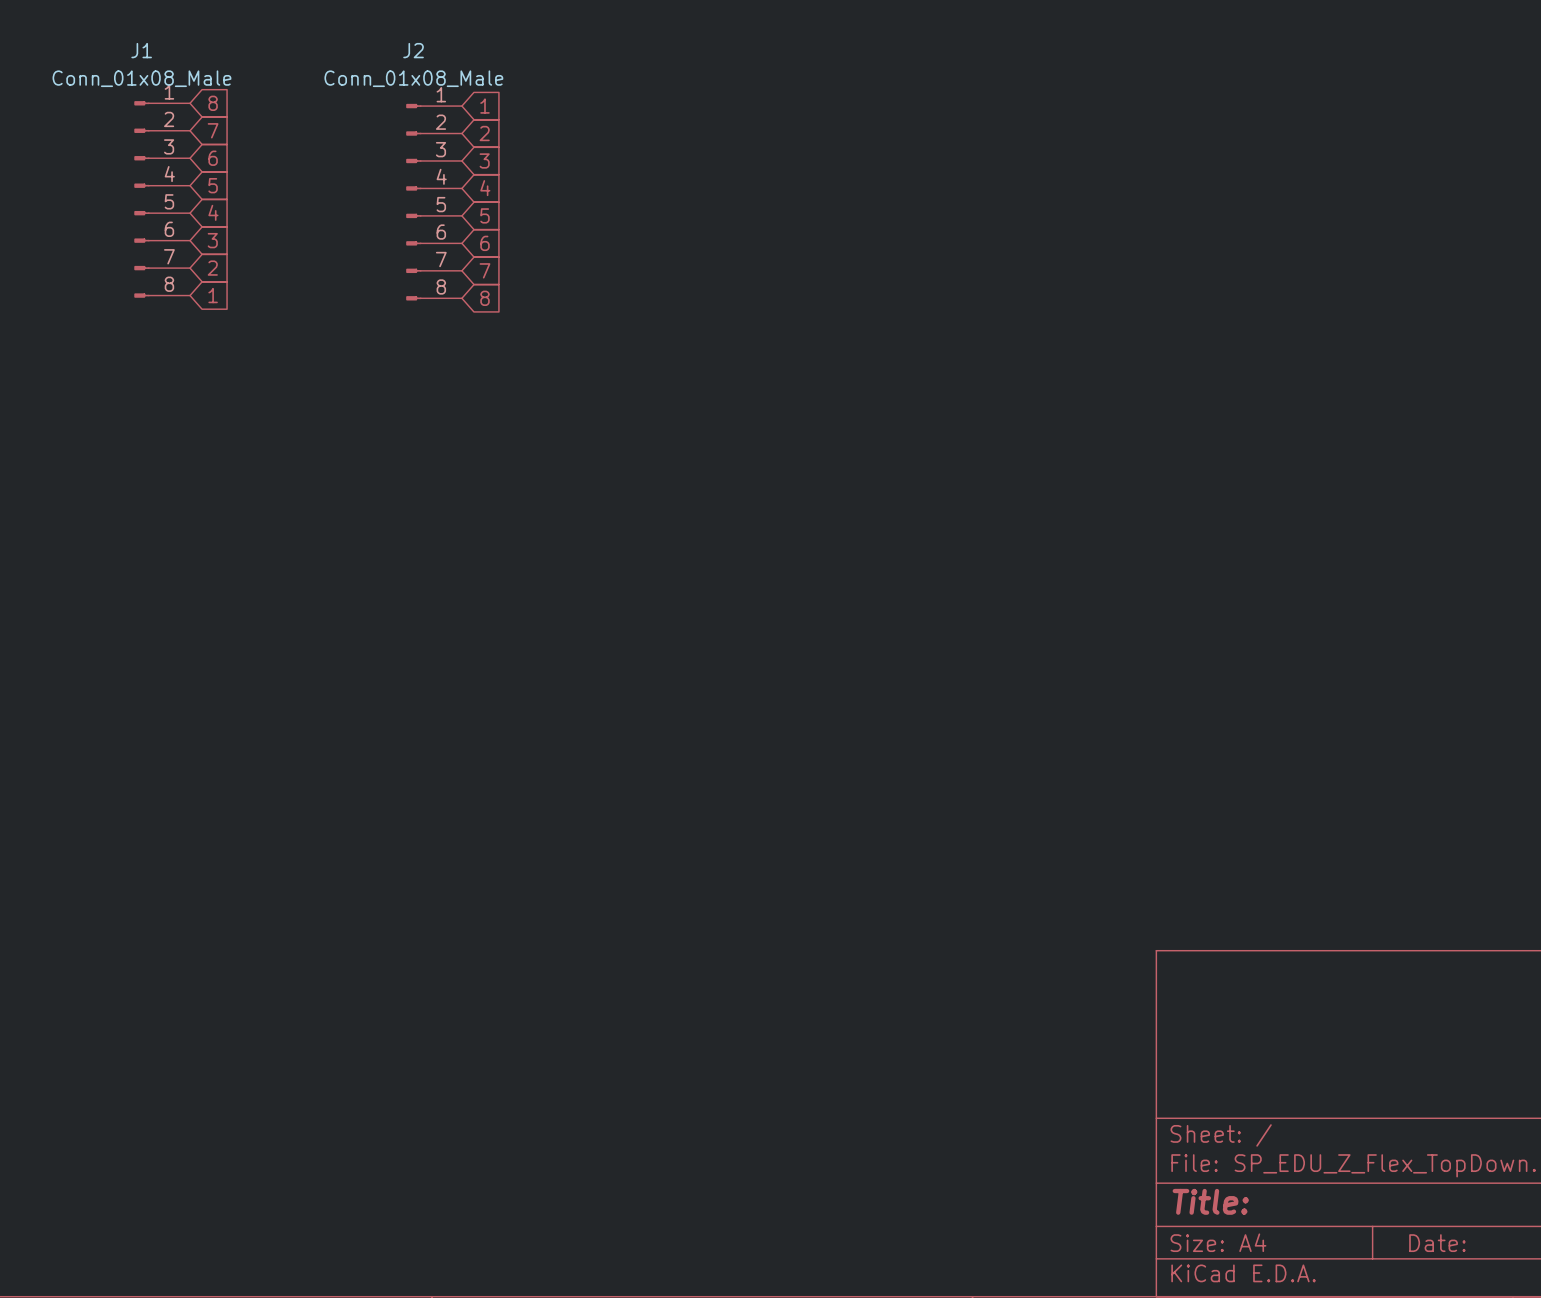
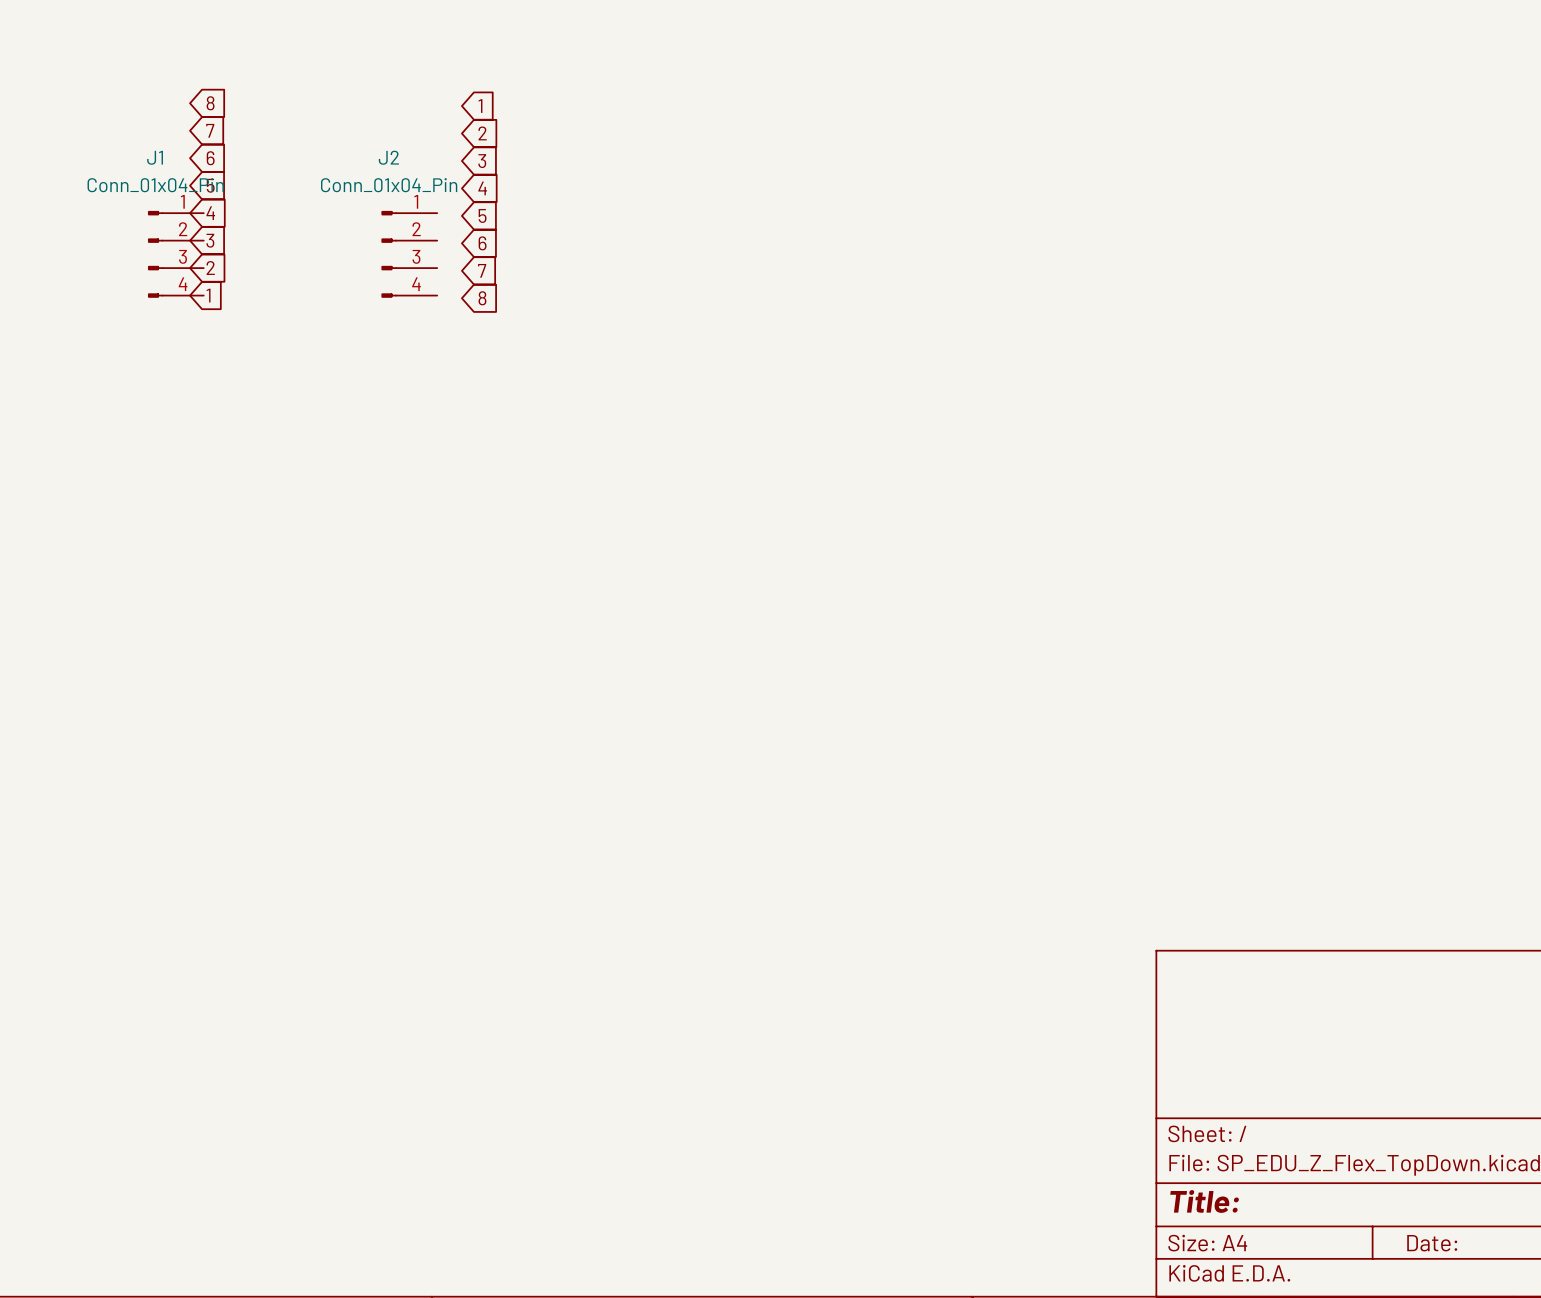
J1 name position: J1 (141, 50) -> J1 (155, 157)
J2 name position: J2 (413, 50) -> J2 (388, 157)
J1 value: Conn_01x08_Male (141, 78) -> Conn_01x04_Pin (155, 185)
J2 value: Conn_01x08_Male (413, 78) -> Conn_01x04_Pin (389, 185)
J1 symbol: [134, 101, 191, 298] -> [148, 210, 204, 298]
J2 symbol: [406, 103, 462, 301] -> [381, 210, 438, 298]

